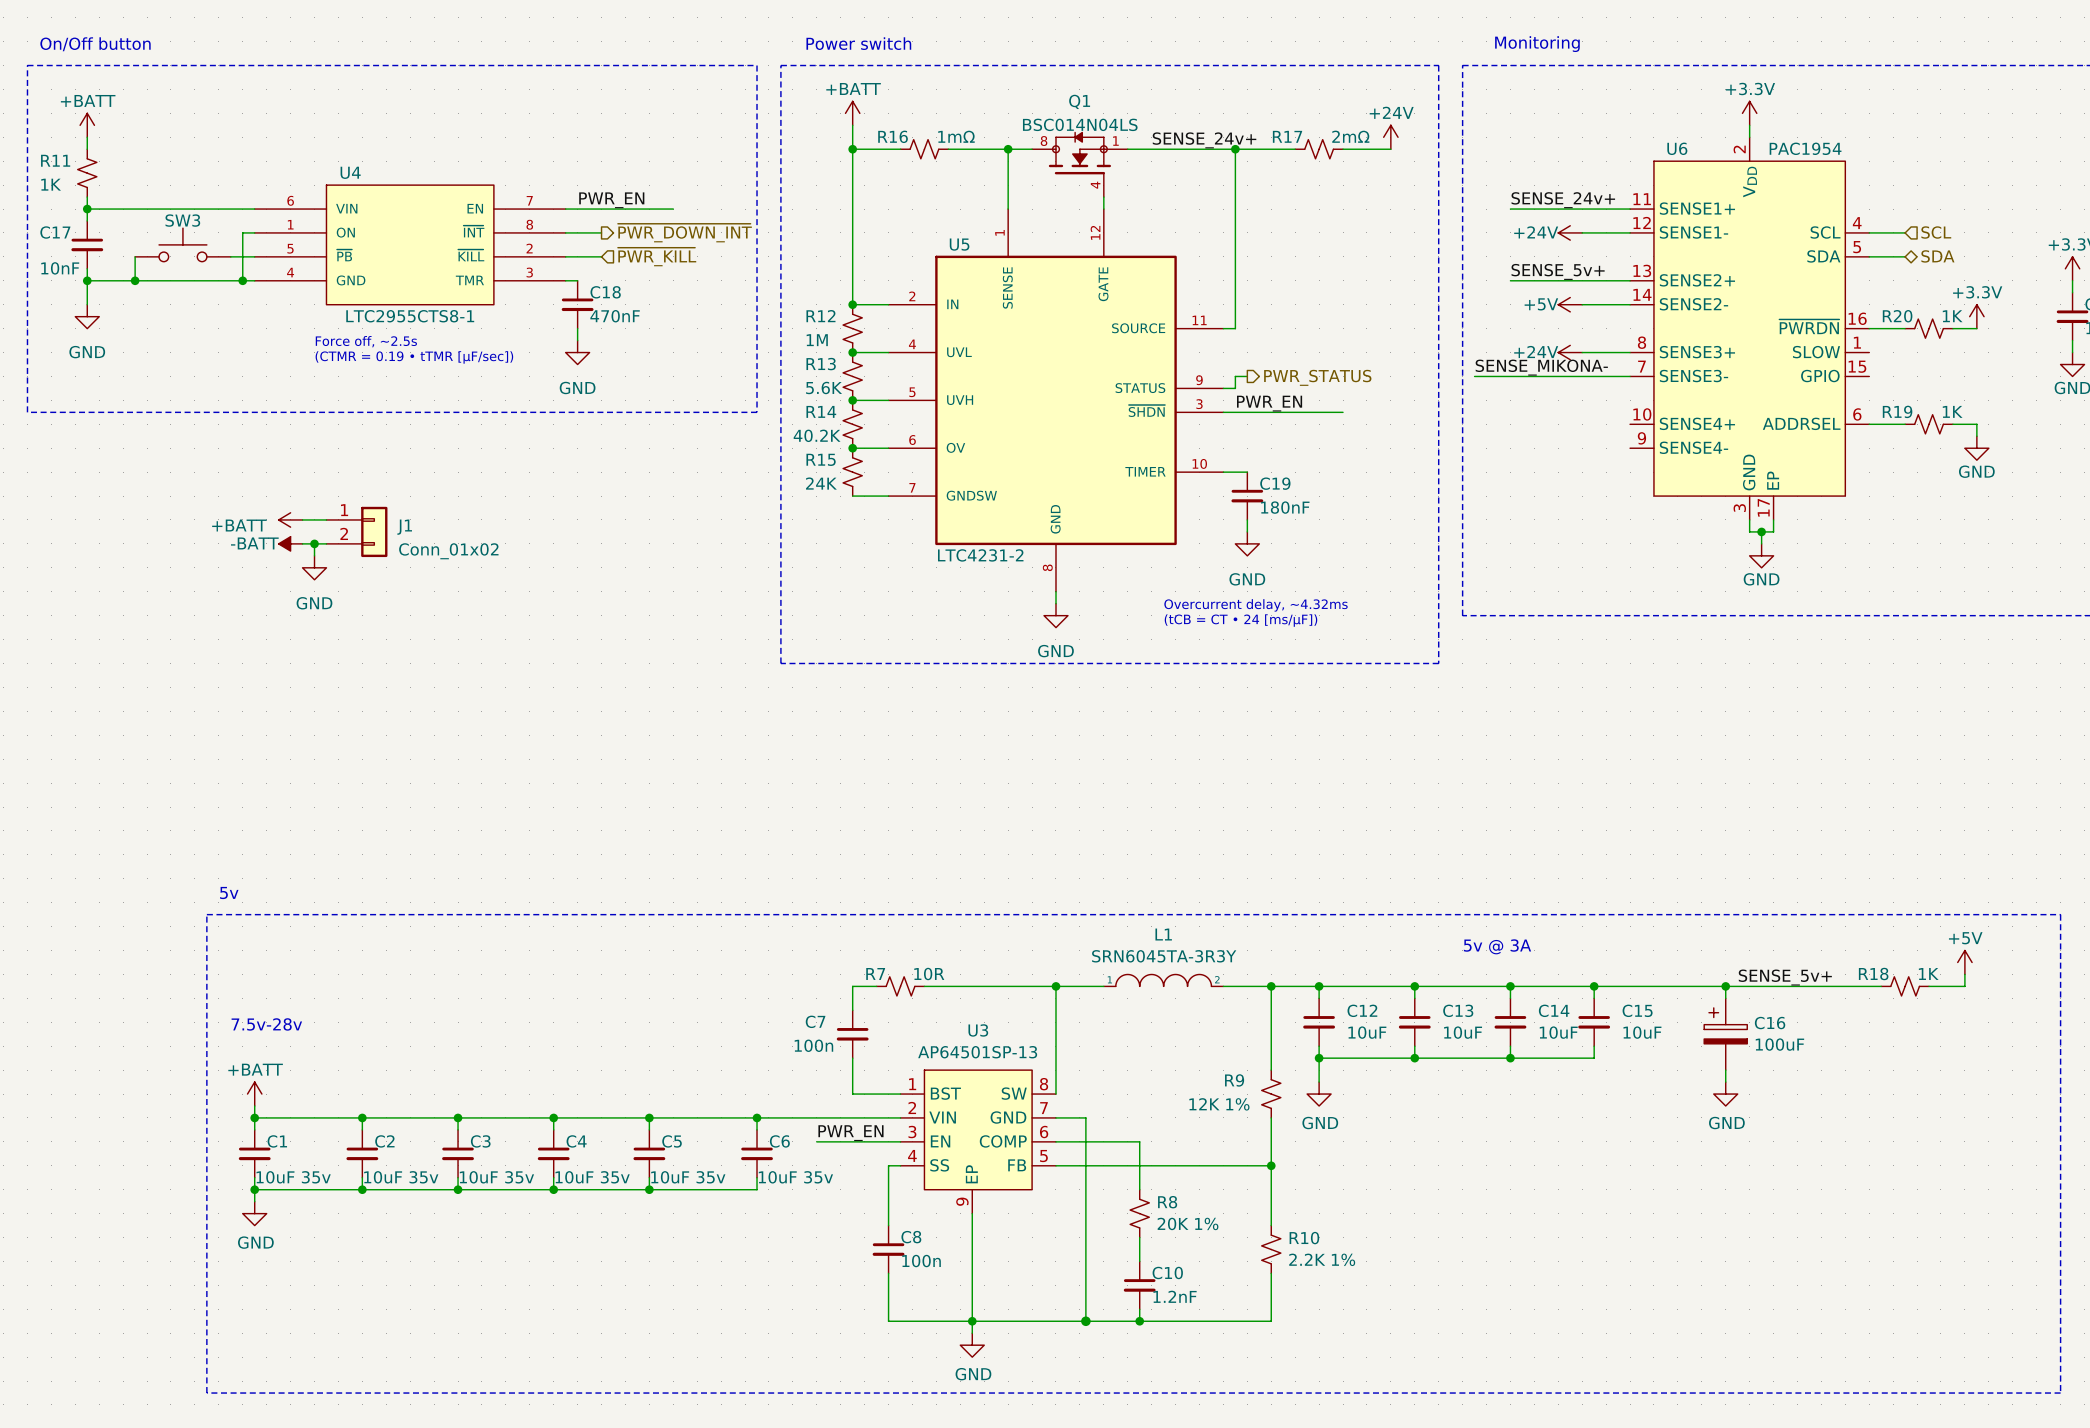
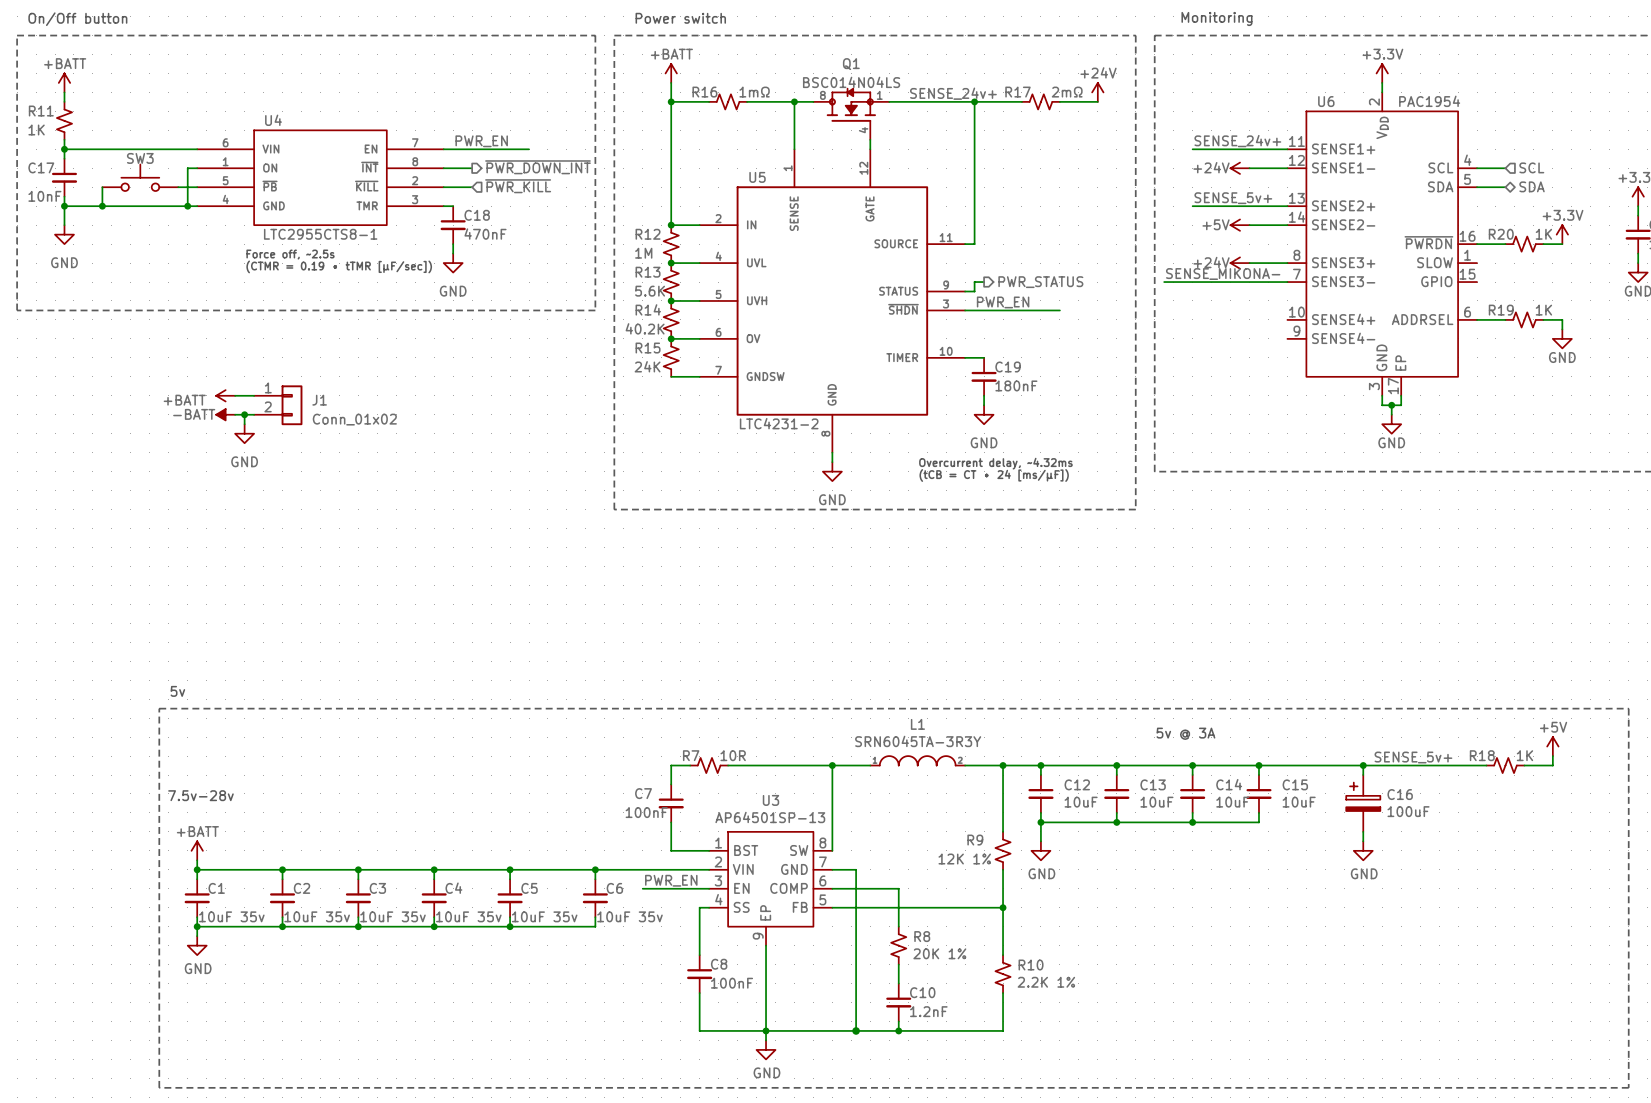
C7 value: 100n (813, 1045) -> 100nF (646, 812)
C8 value: 100n (921, 1261) -> 100nF (732, 983)

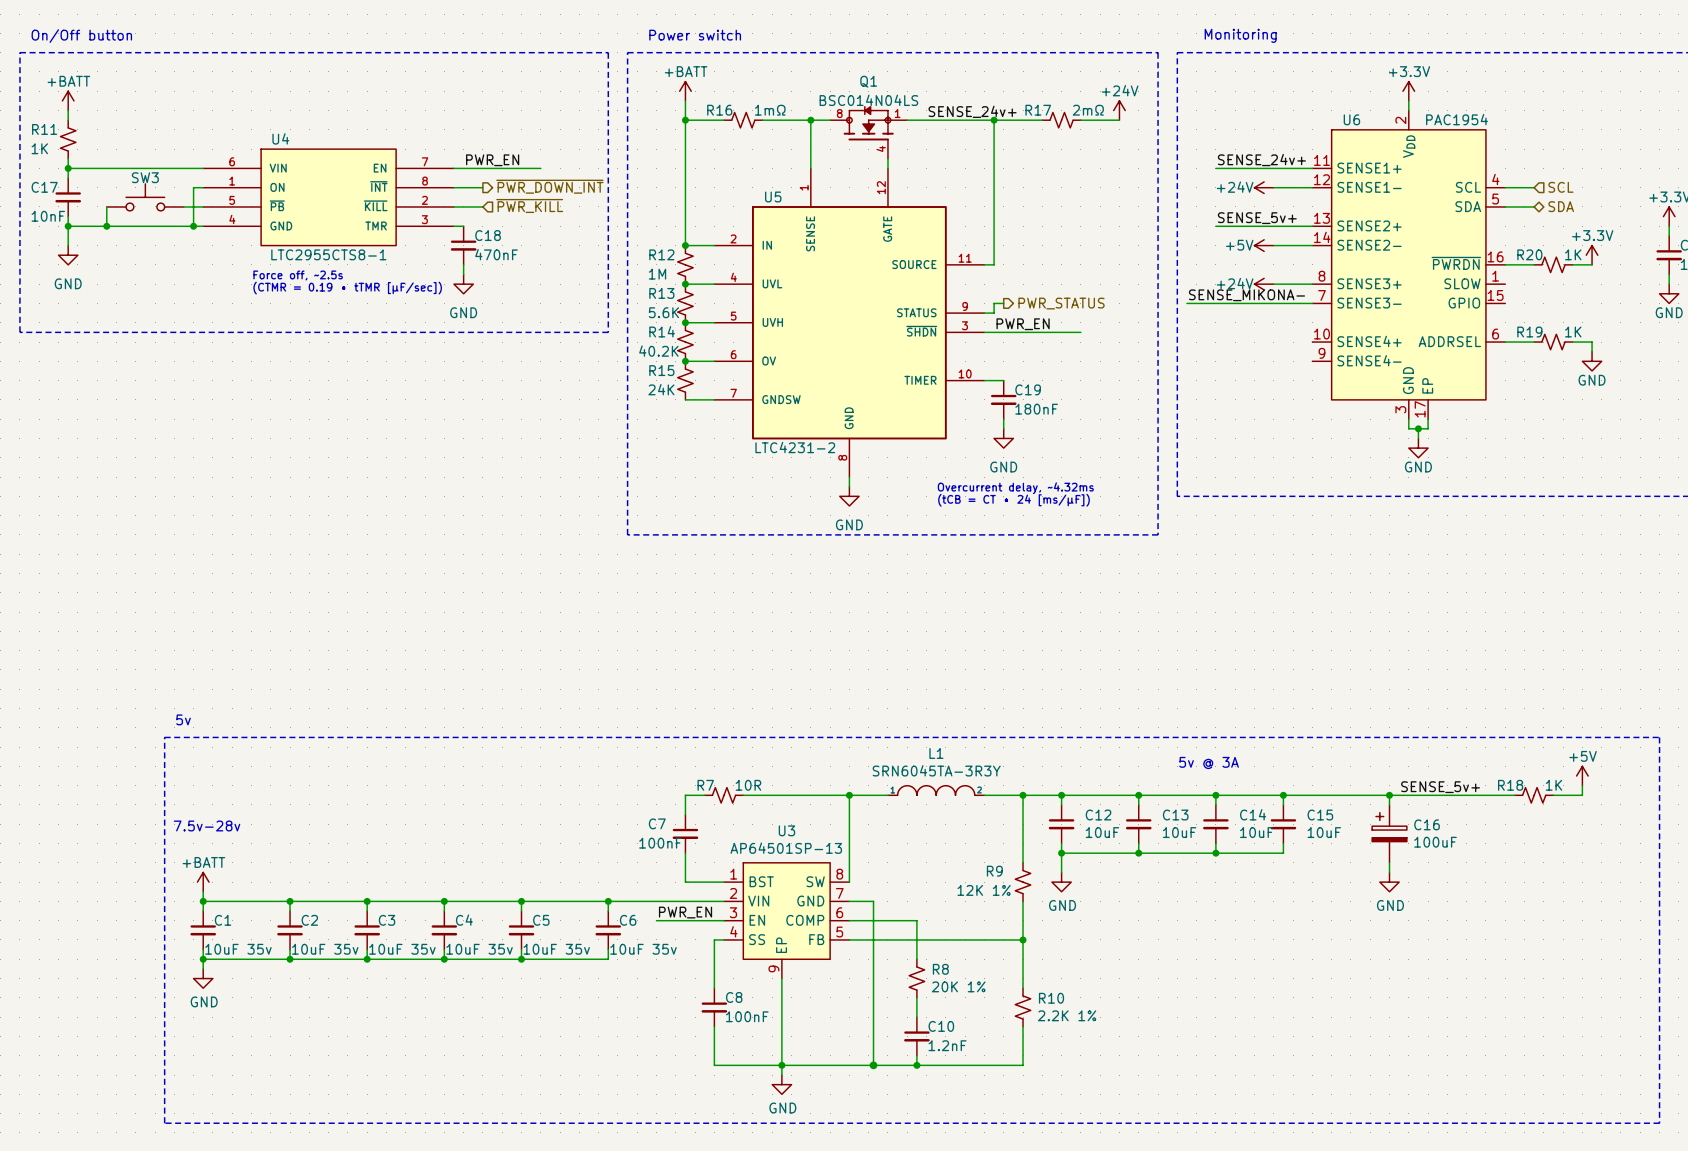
power symbol: +BATT (225, 395) -> none
wire: (235, 395) (254, 395) -> none
J1: Conn_01x02 (278, 405) -> none
power symbol: -BATT (225, 414) -> none
wire: (235, 414) (254, 414) -> none
wire: (244, 414) (244, 424) -> none
junction: (244, 414) -> none
power symbol: GND (244, 433) -> none

